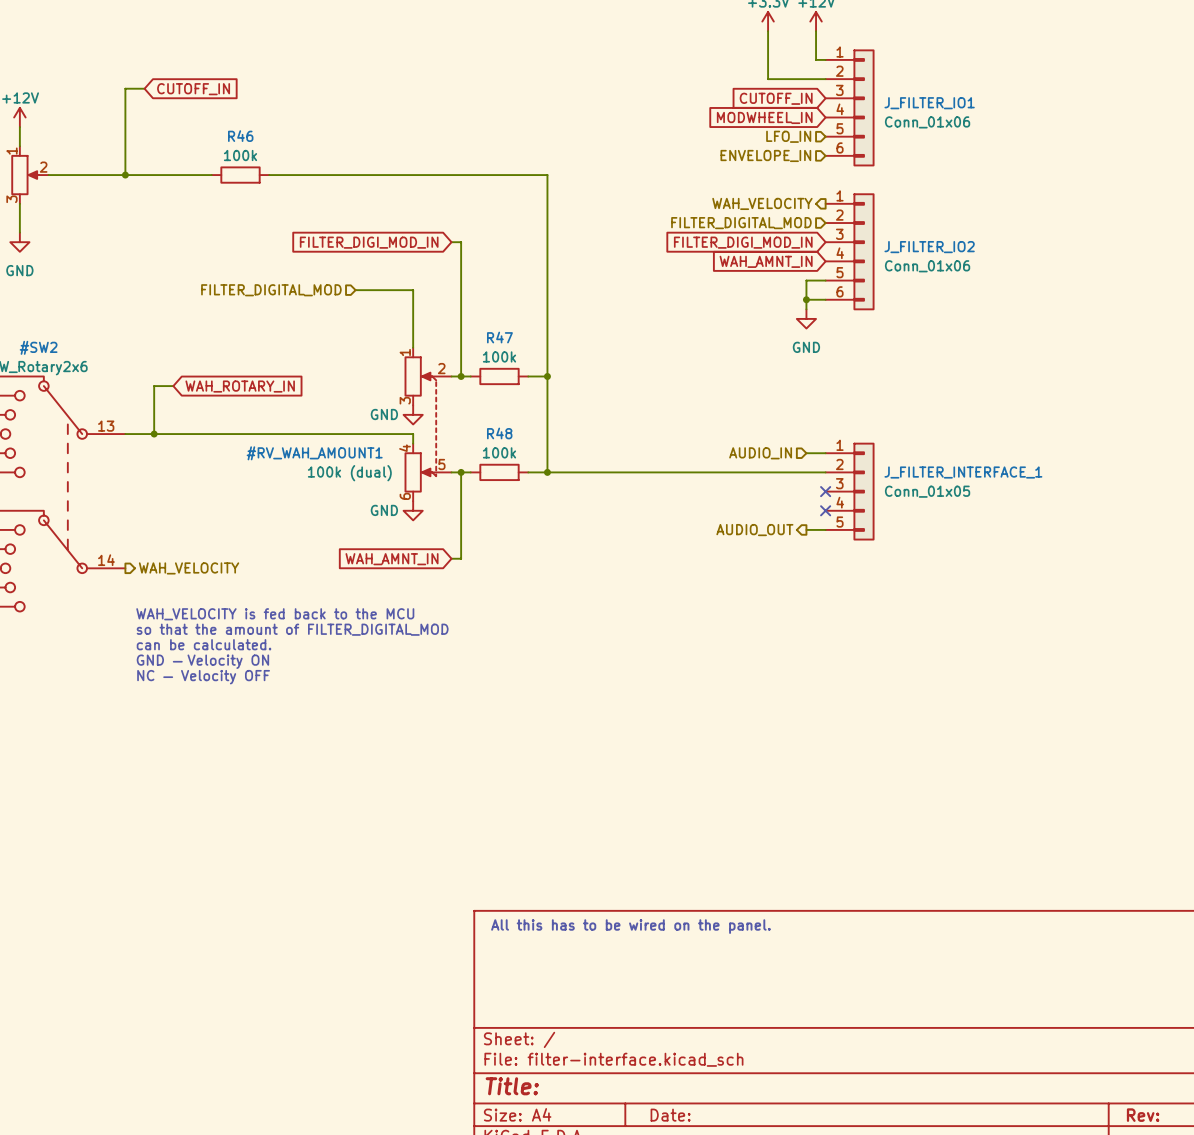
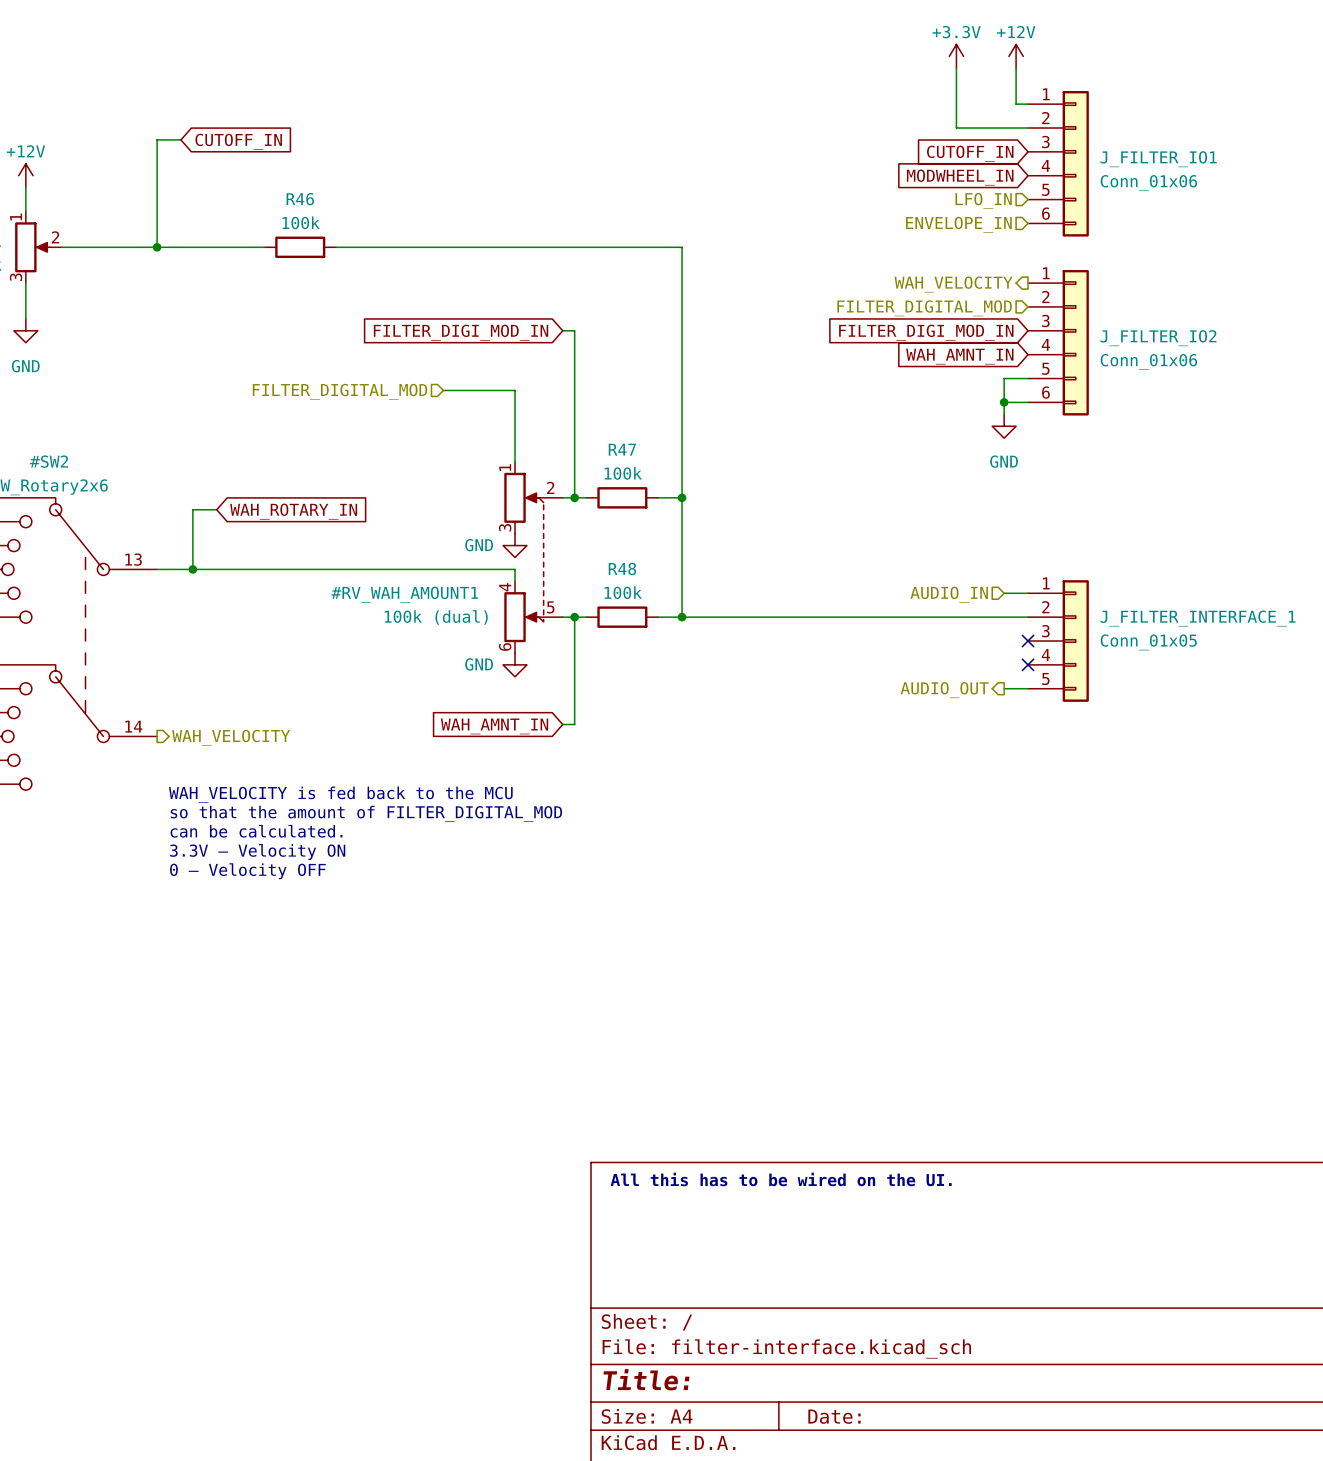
text: GND — Velocity ON (202, 661) -> 3.3V — Velocity ON (257, 852)
text: NC — Velocity OFF (203, 677) -> 0 — Velocity OFF (247, 871)
text: All this has to be wired on the panel. (630, 926) -> All this has to be wired on the UI. (781, 1179)

